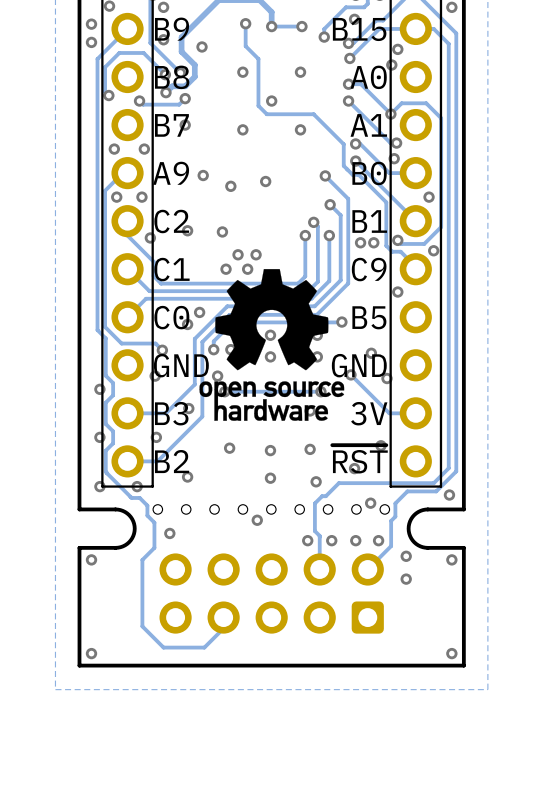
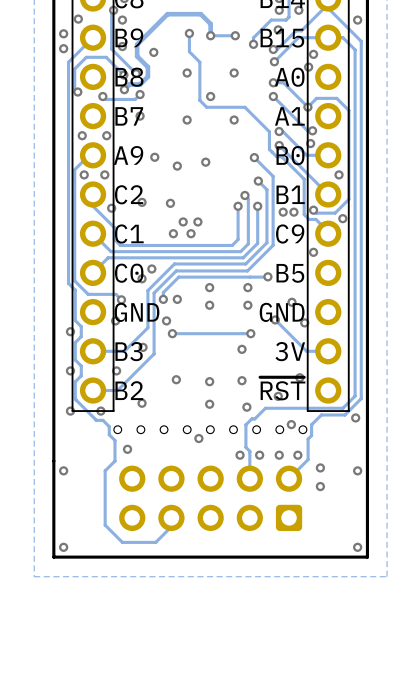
drawing: [199, 269, 345, 421] -> none
board edge: (79, 509) (122, 510) (132, 519) (134, 528) (132, 538) (122, 546) (79, 547) -> (53, 429) (53, 461)
board edge: (463, 509) (420, 510) (411, 519) (408, 528) (412, 540) (420, 546) (463, 547) -> (367, 429) (367, 461)

